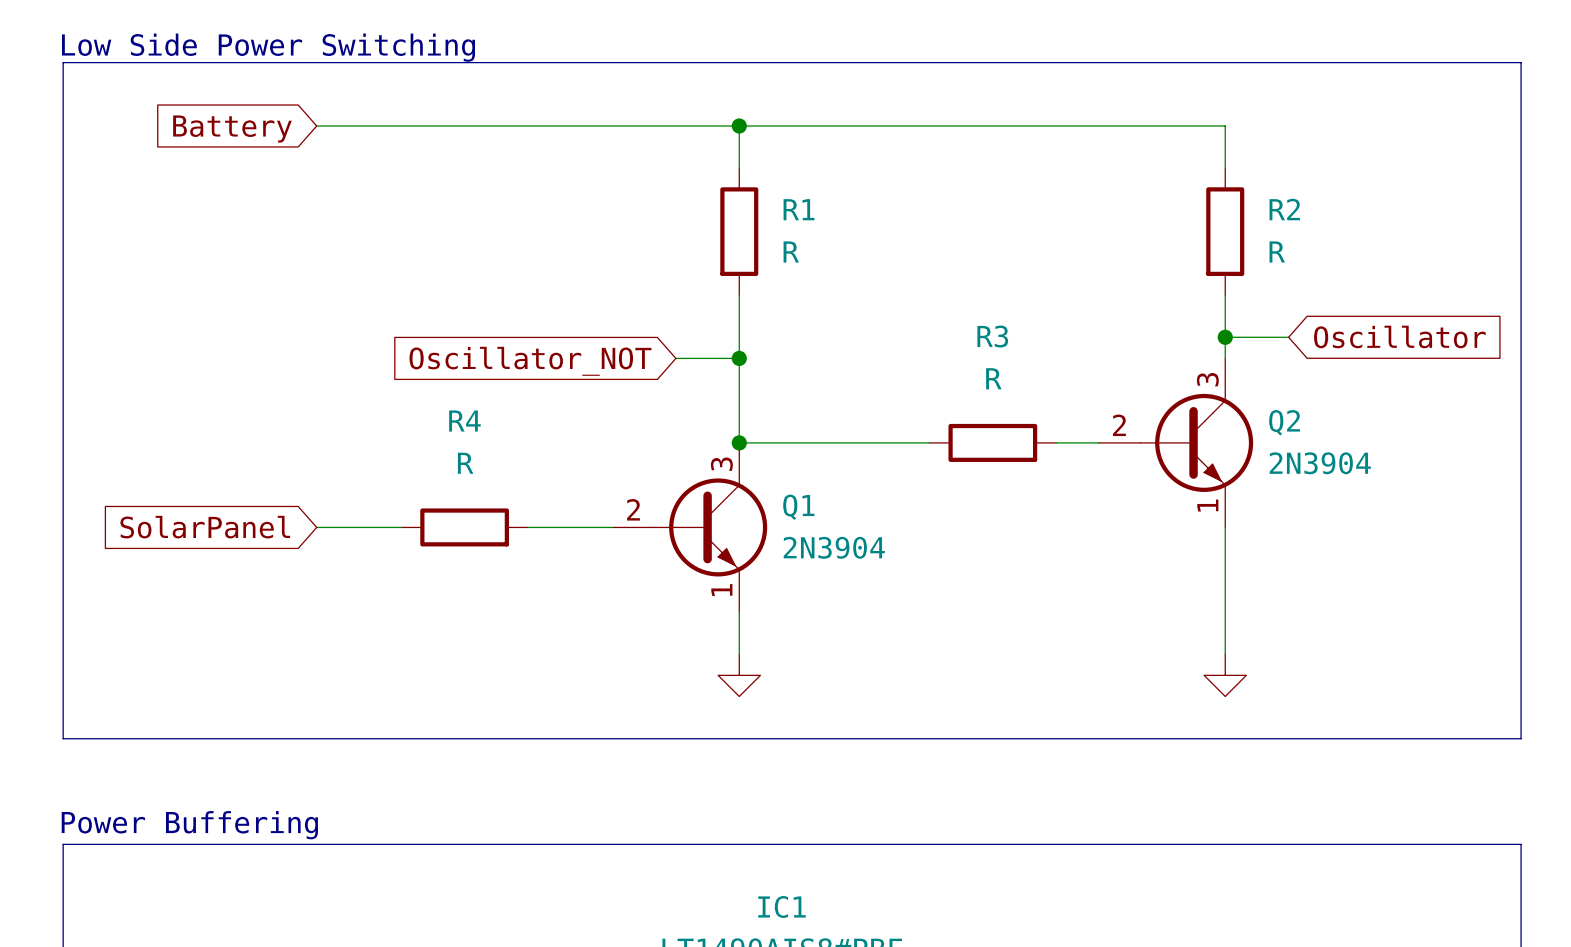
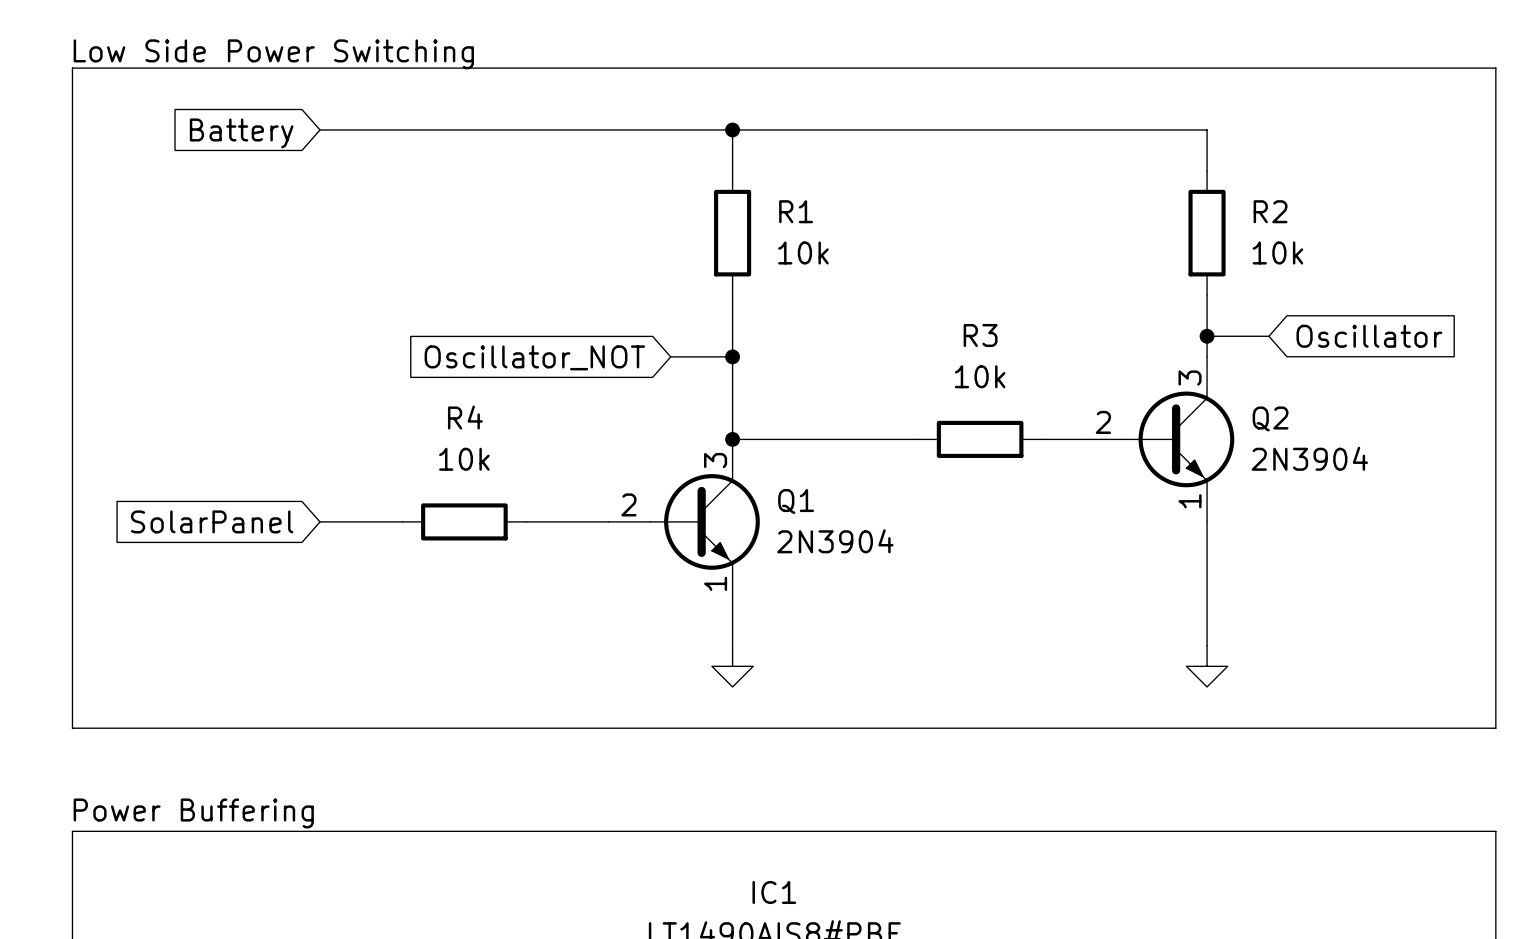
R1 value: R (791, 251) -> 10k (803, 252)
R2 value: R (1277, 251) -> 10k (1277, 252)
R3 value: R (993, 378) -> 10k (980, 376)
R4 value: R (465, 463) -> 10k (464, 459)

